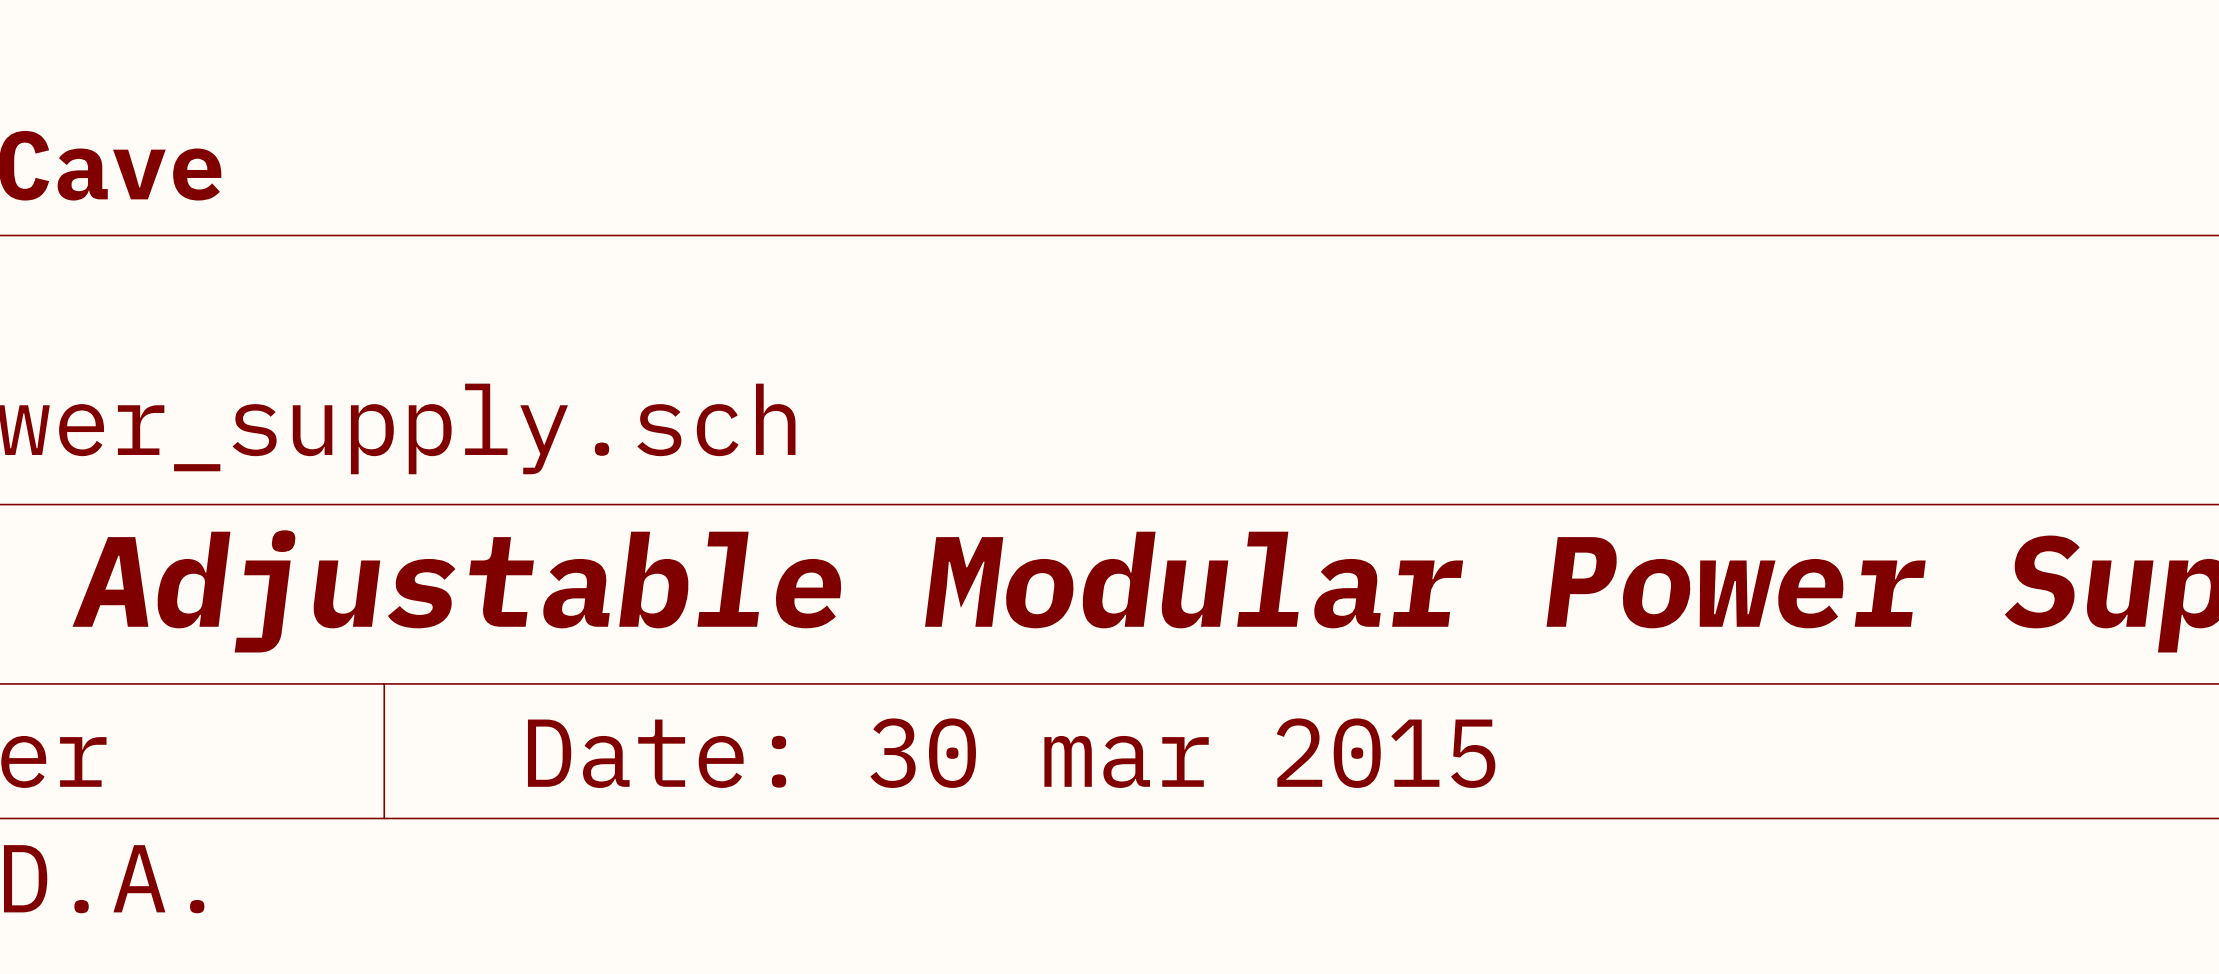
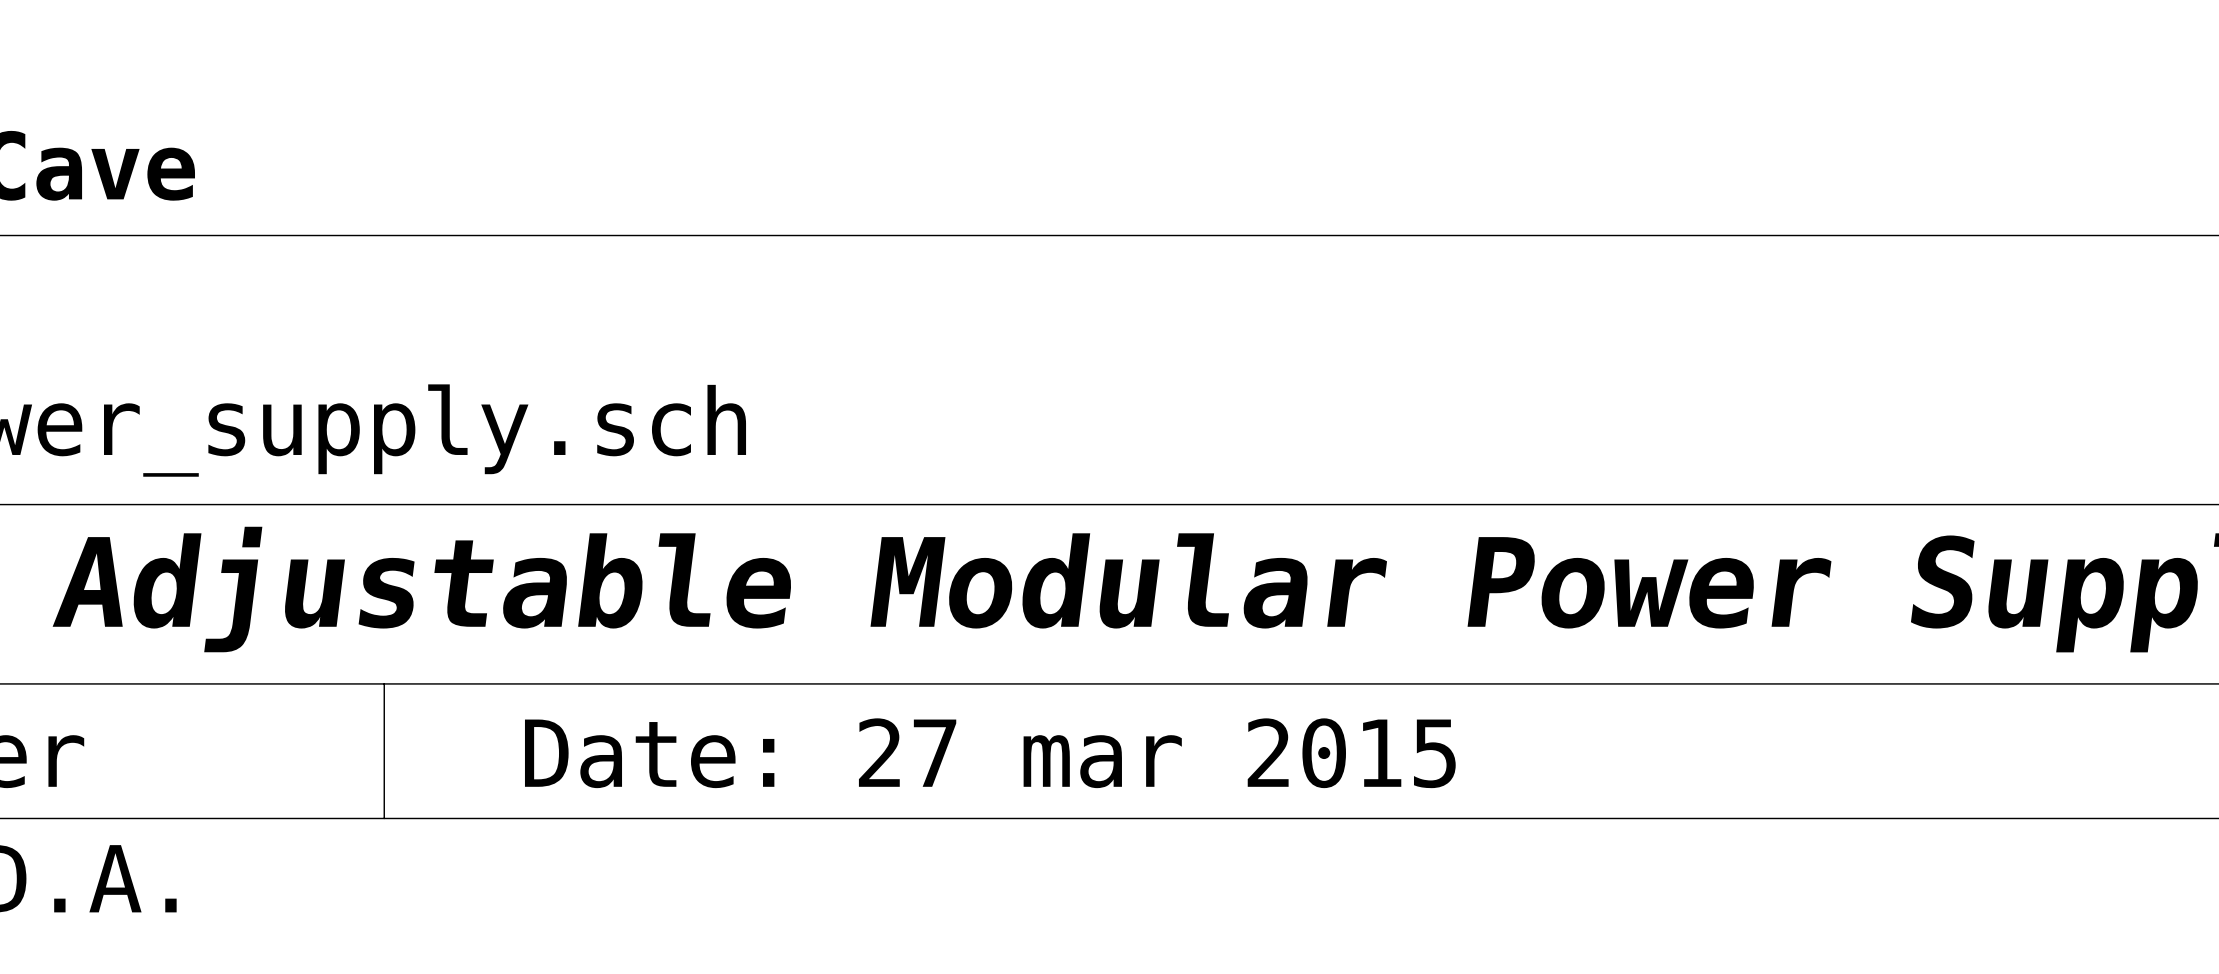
title block: Date: 30 mar 2015 (1011, 753) -> Date: 27 mar 2015 (990, 753)

